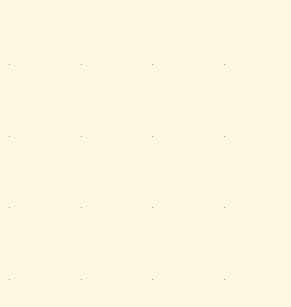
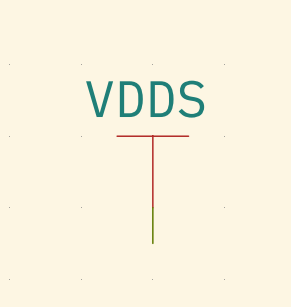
power symbol: none -> VDDS (152, 171)
wire: none -> (152, 207) (152, 243)

